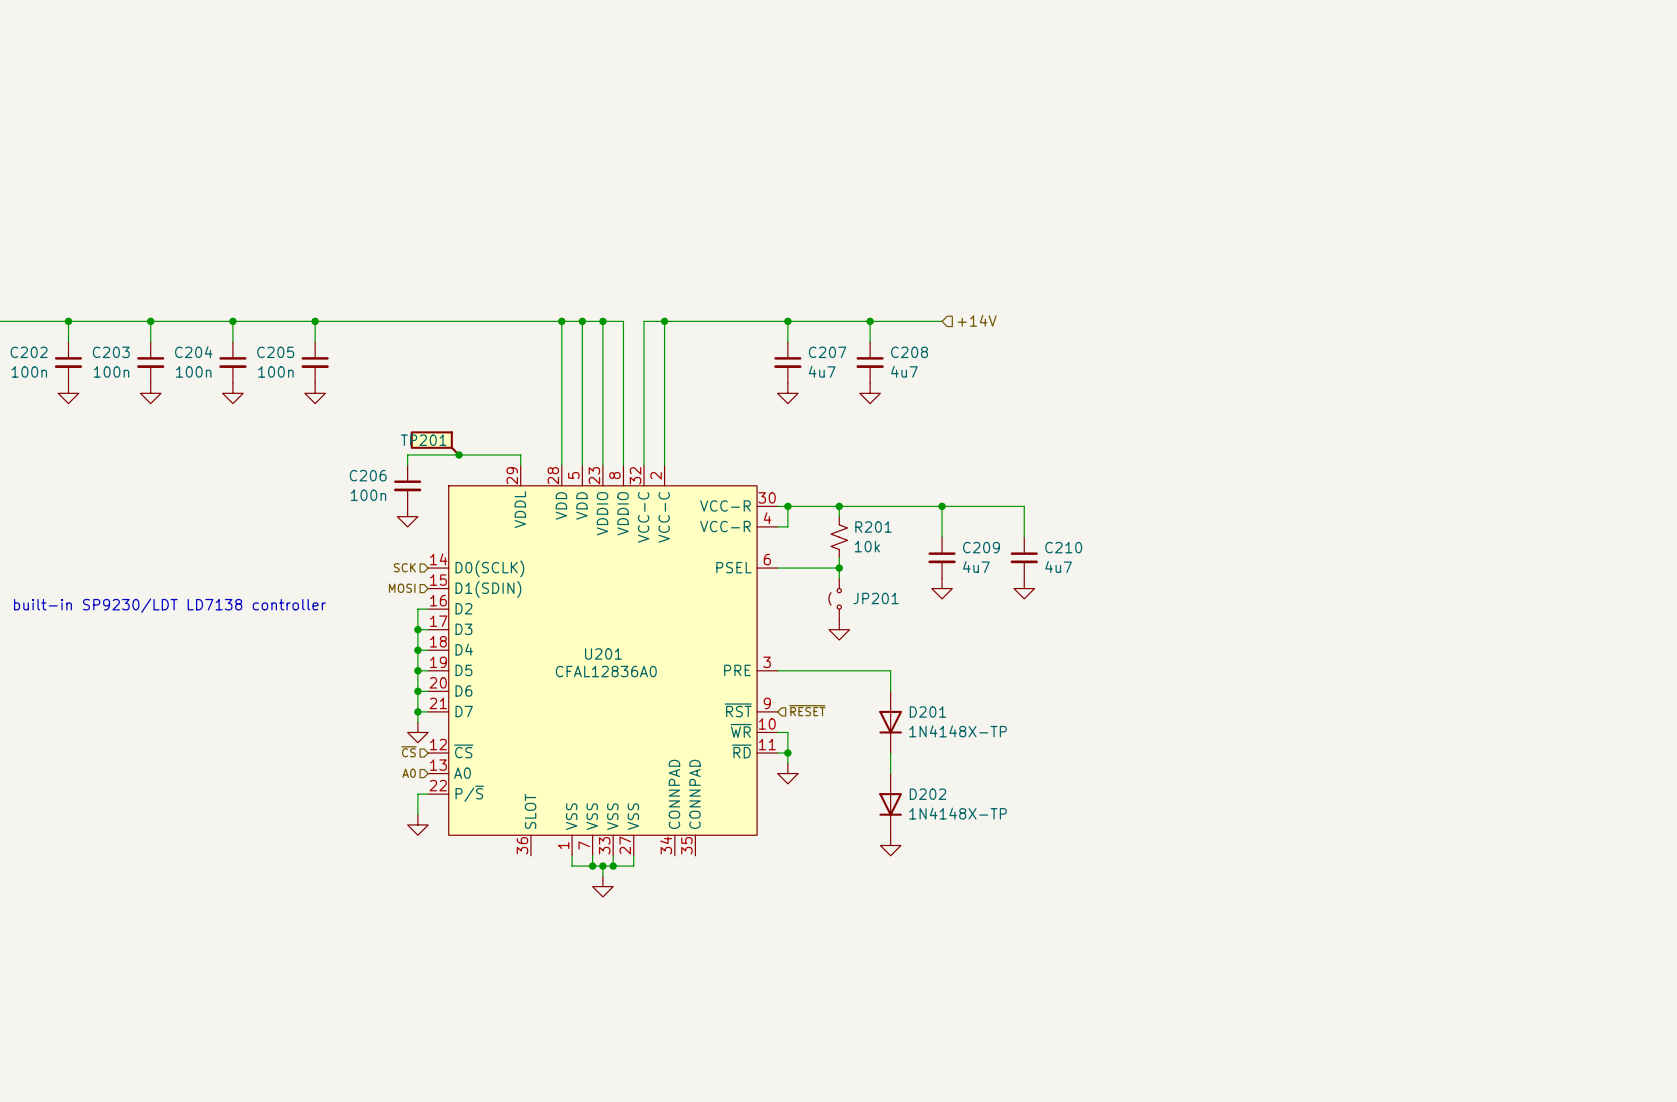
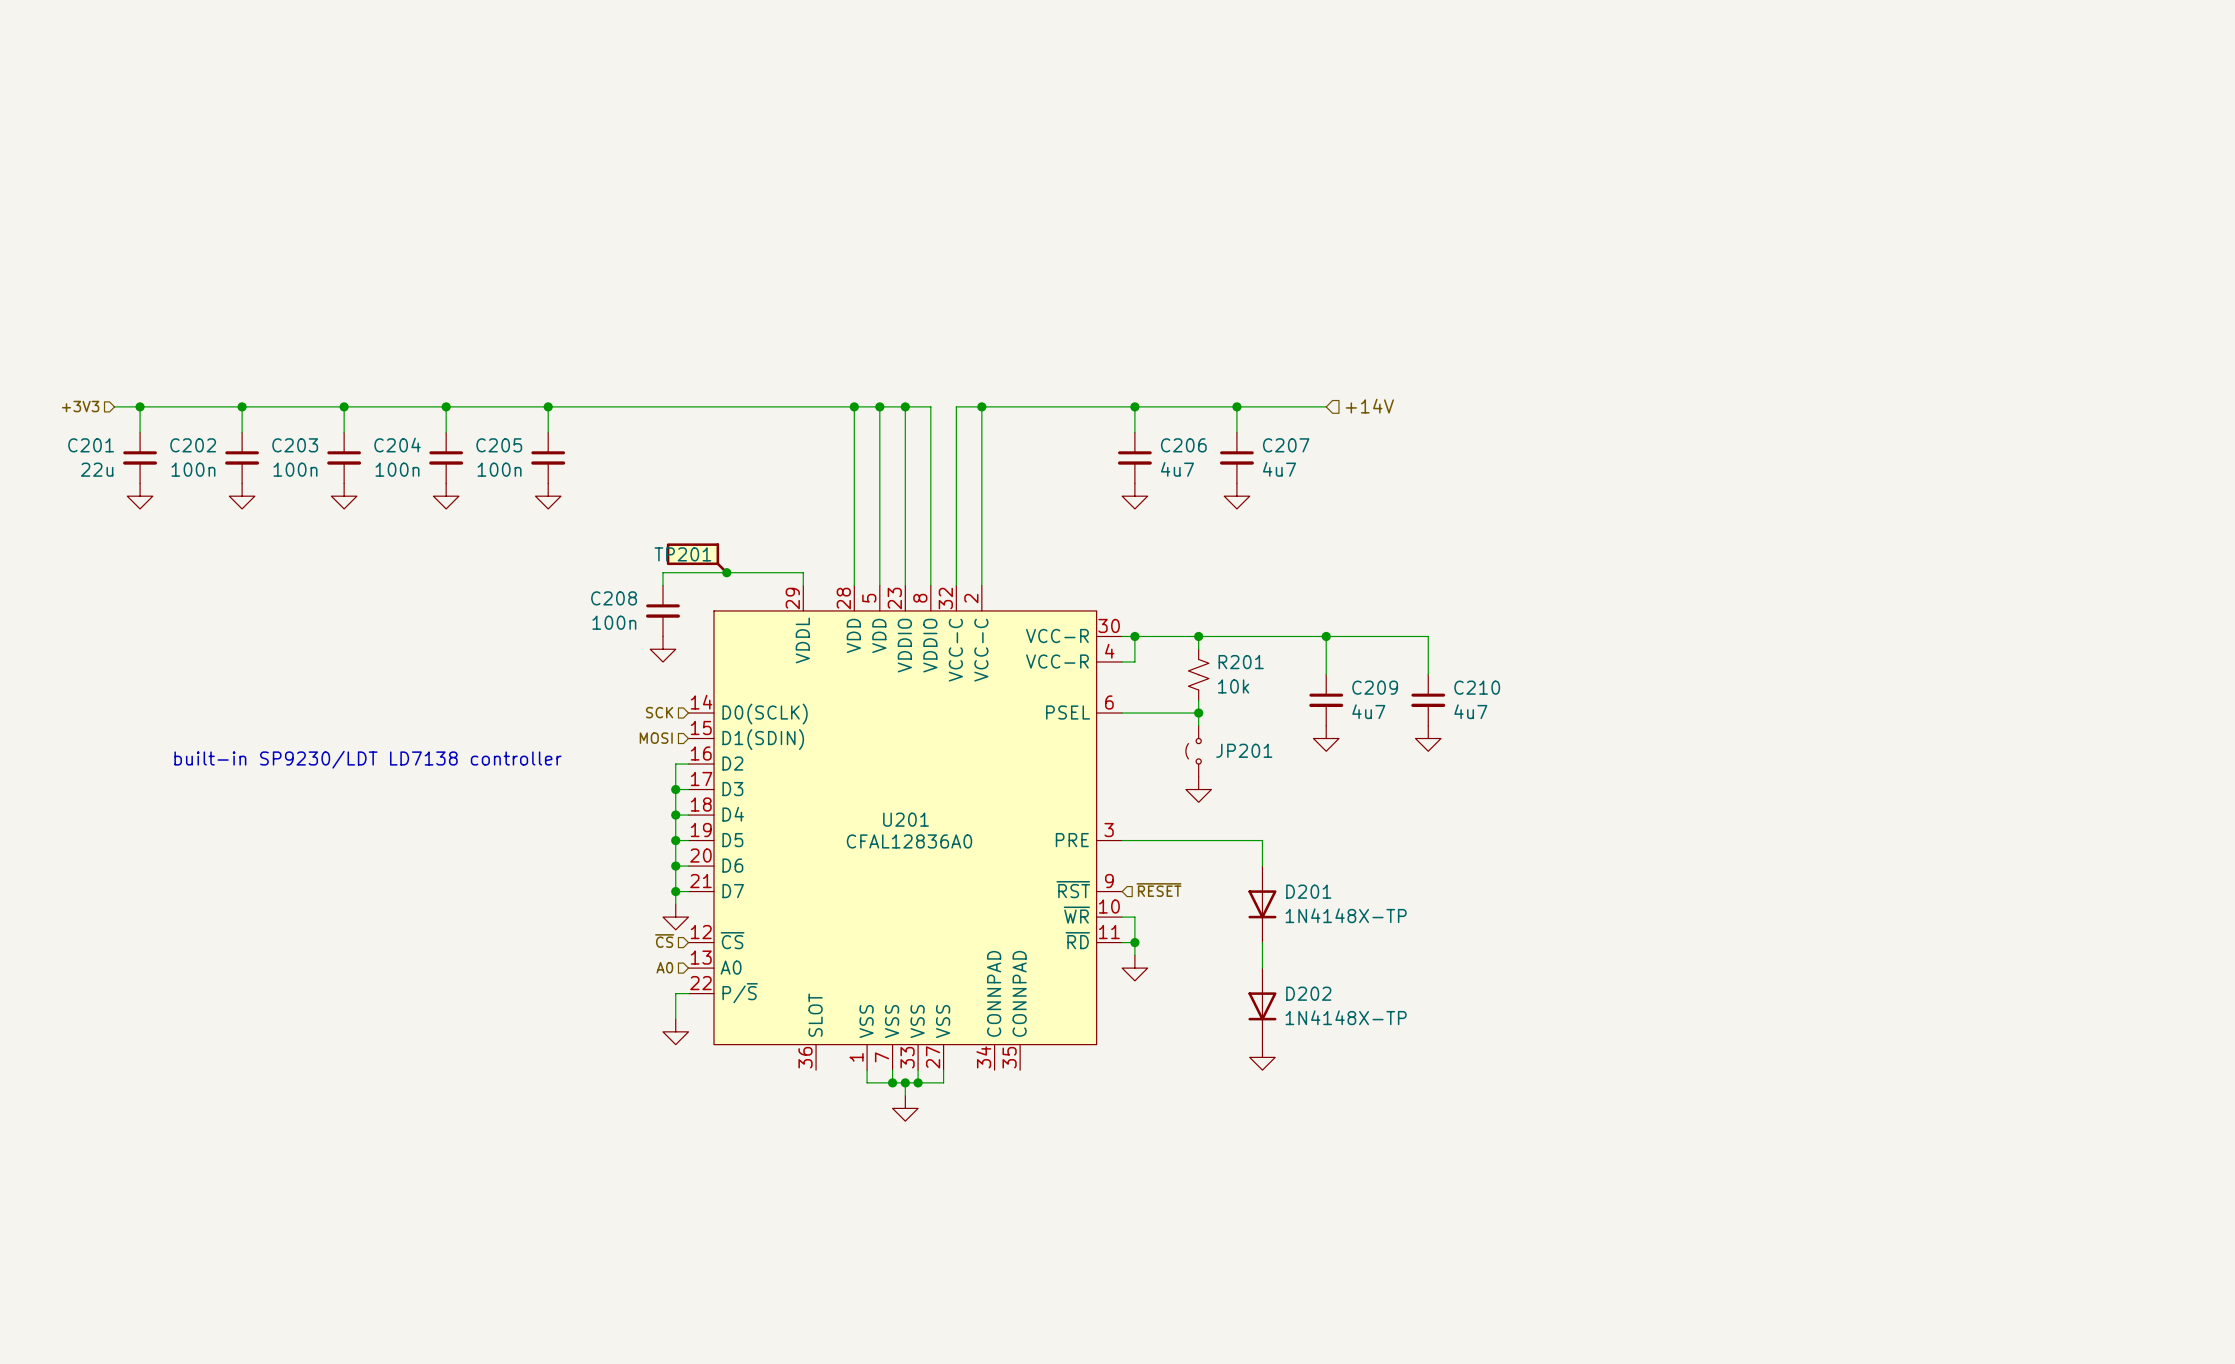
C207 name: C207 (827, 352) -> C206 (1183, 445)
C208 name: C208 (909, 352) -> C207 (1286, 445)
C206 name: C206 (368, 475) -> C208 (614, 598)

